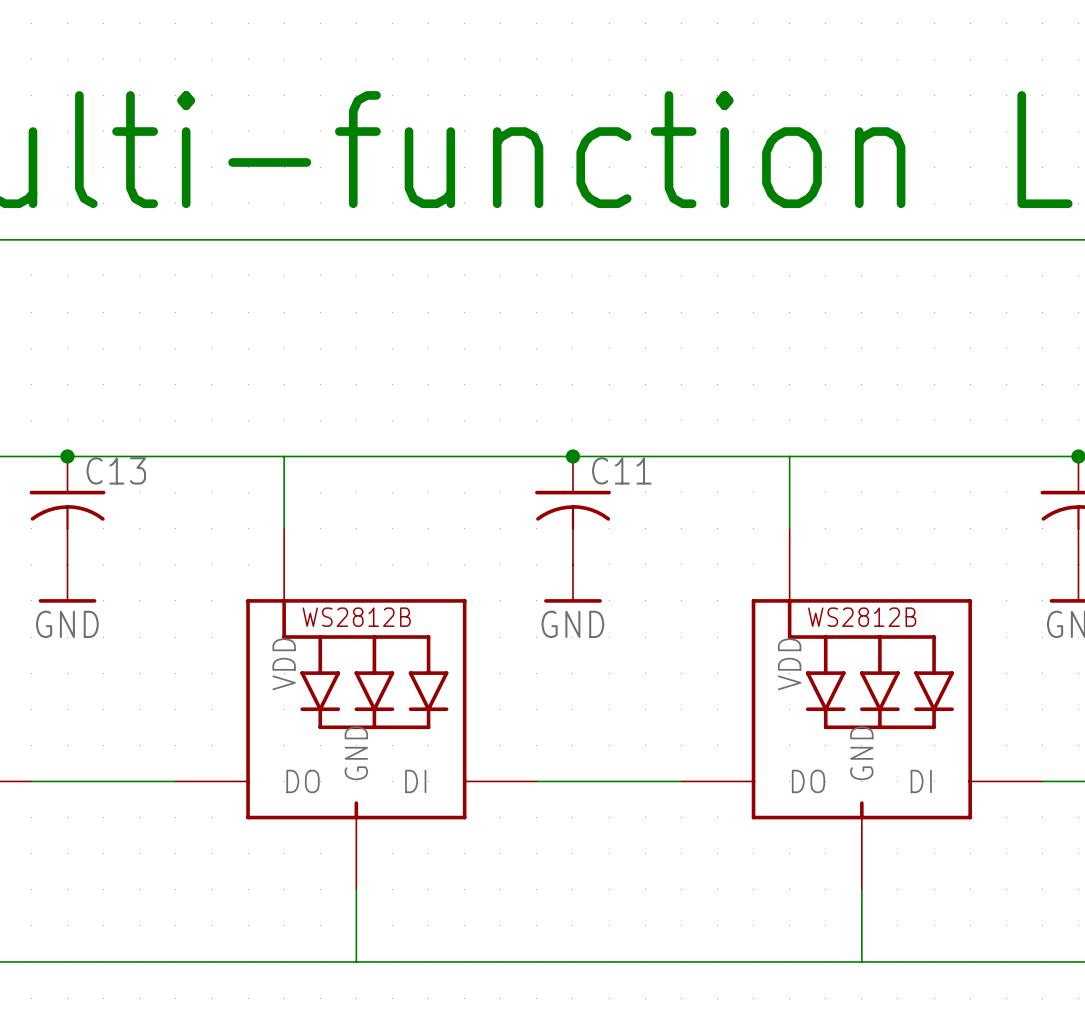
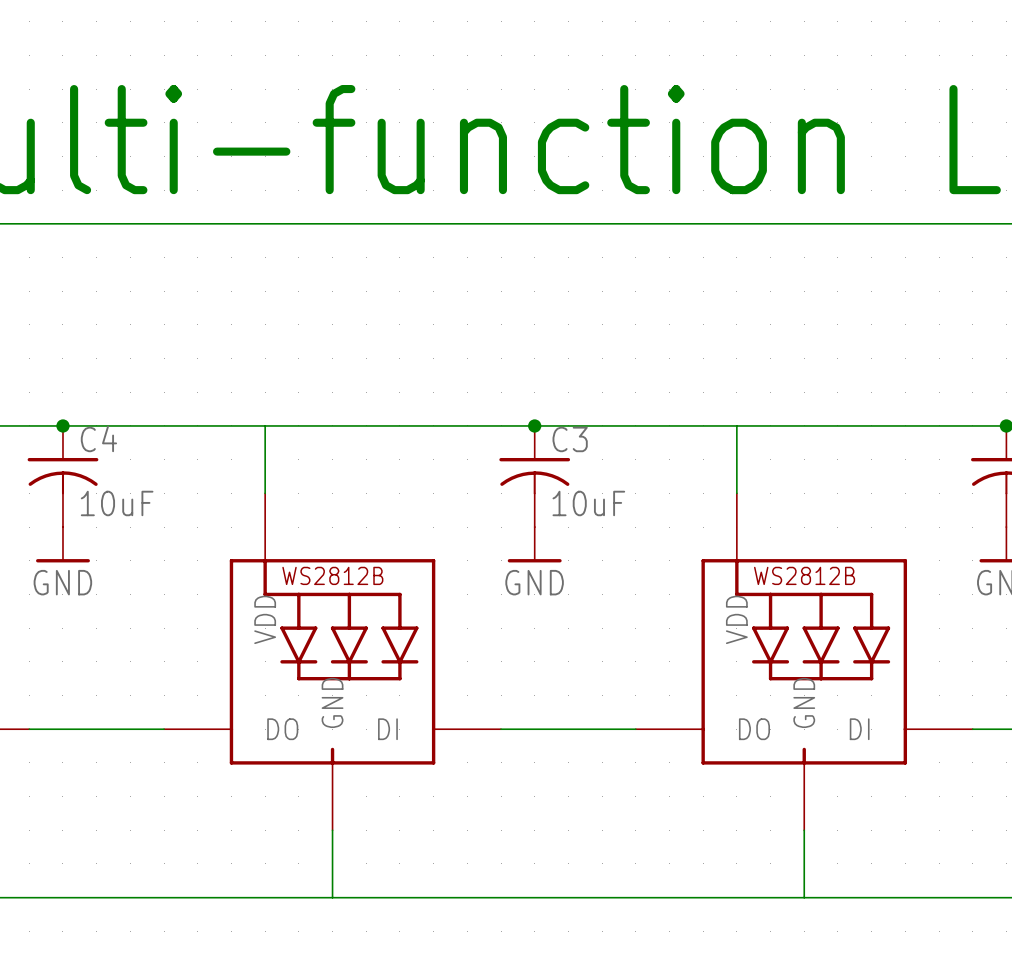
C13 name: C13 (116, 470) -> C4 (98, 438)
C11 name: C11 (621, 470) -> C3 (570, 439)
C13 value: none -> 10uF (117, 503)
C11 value: none -> 10uF (588, 503)

